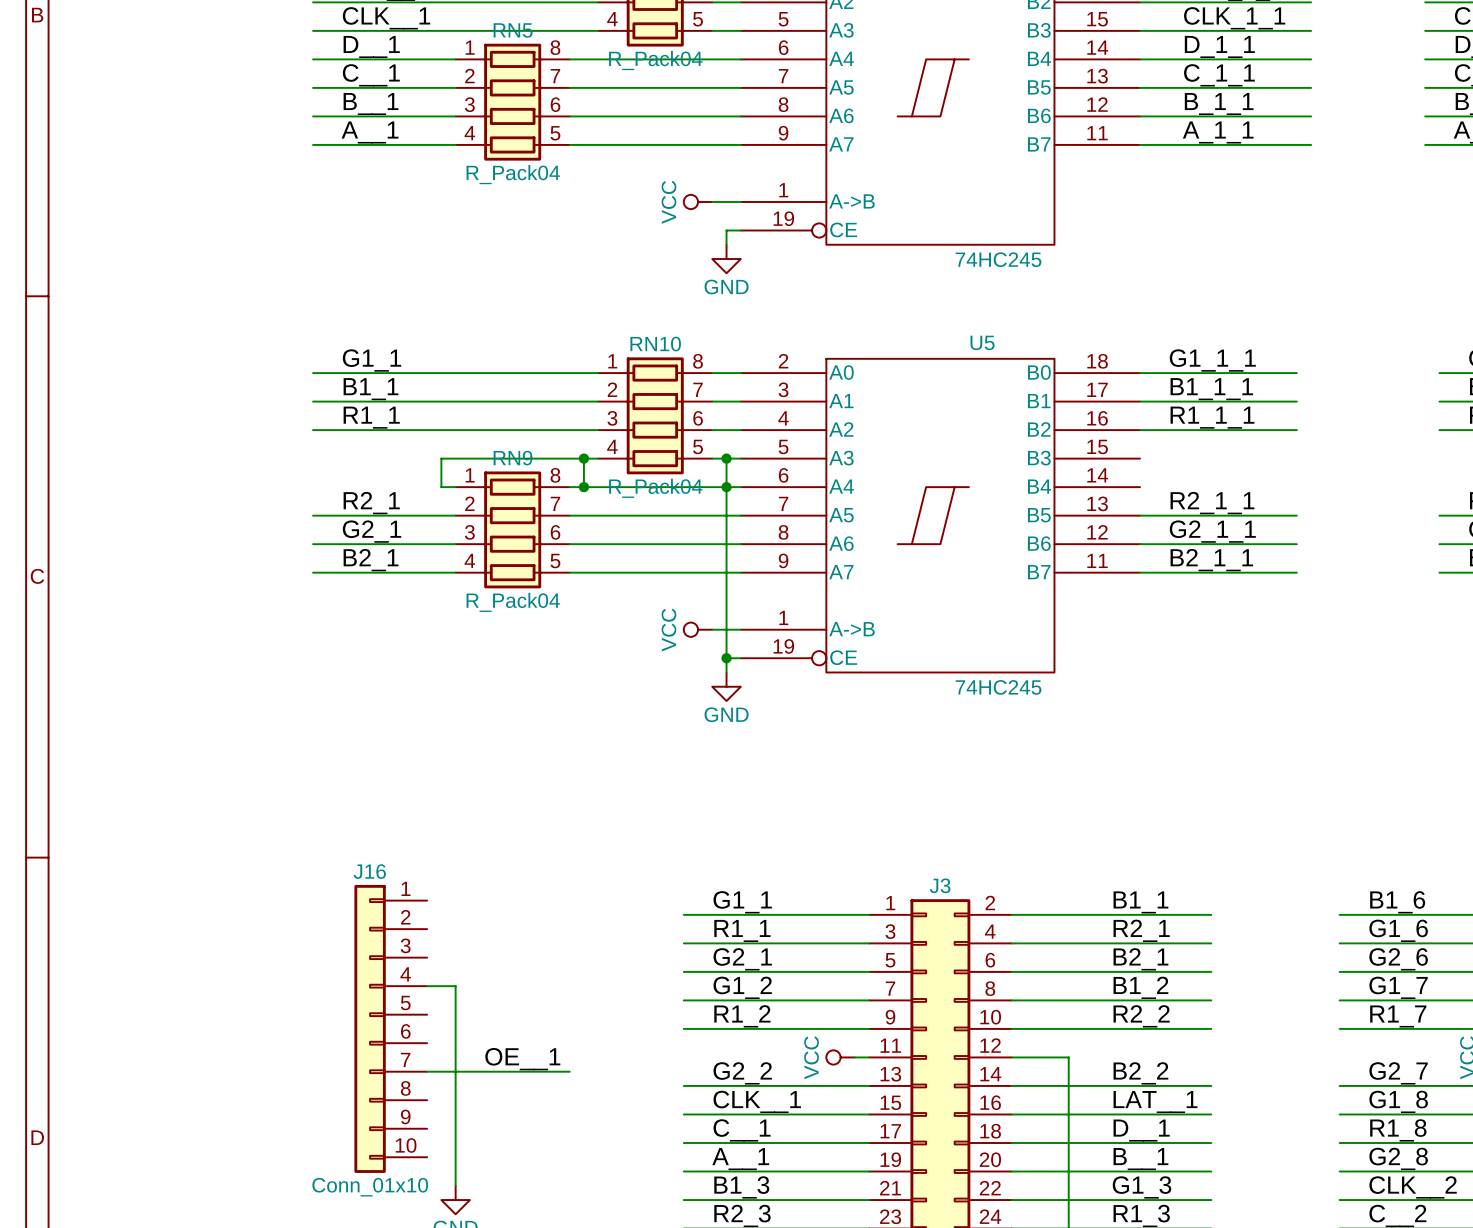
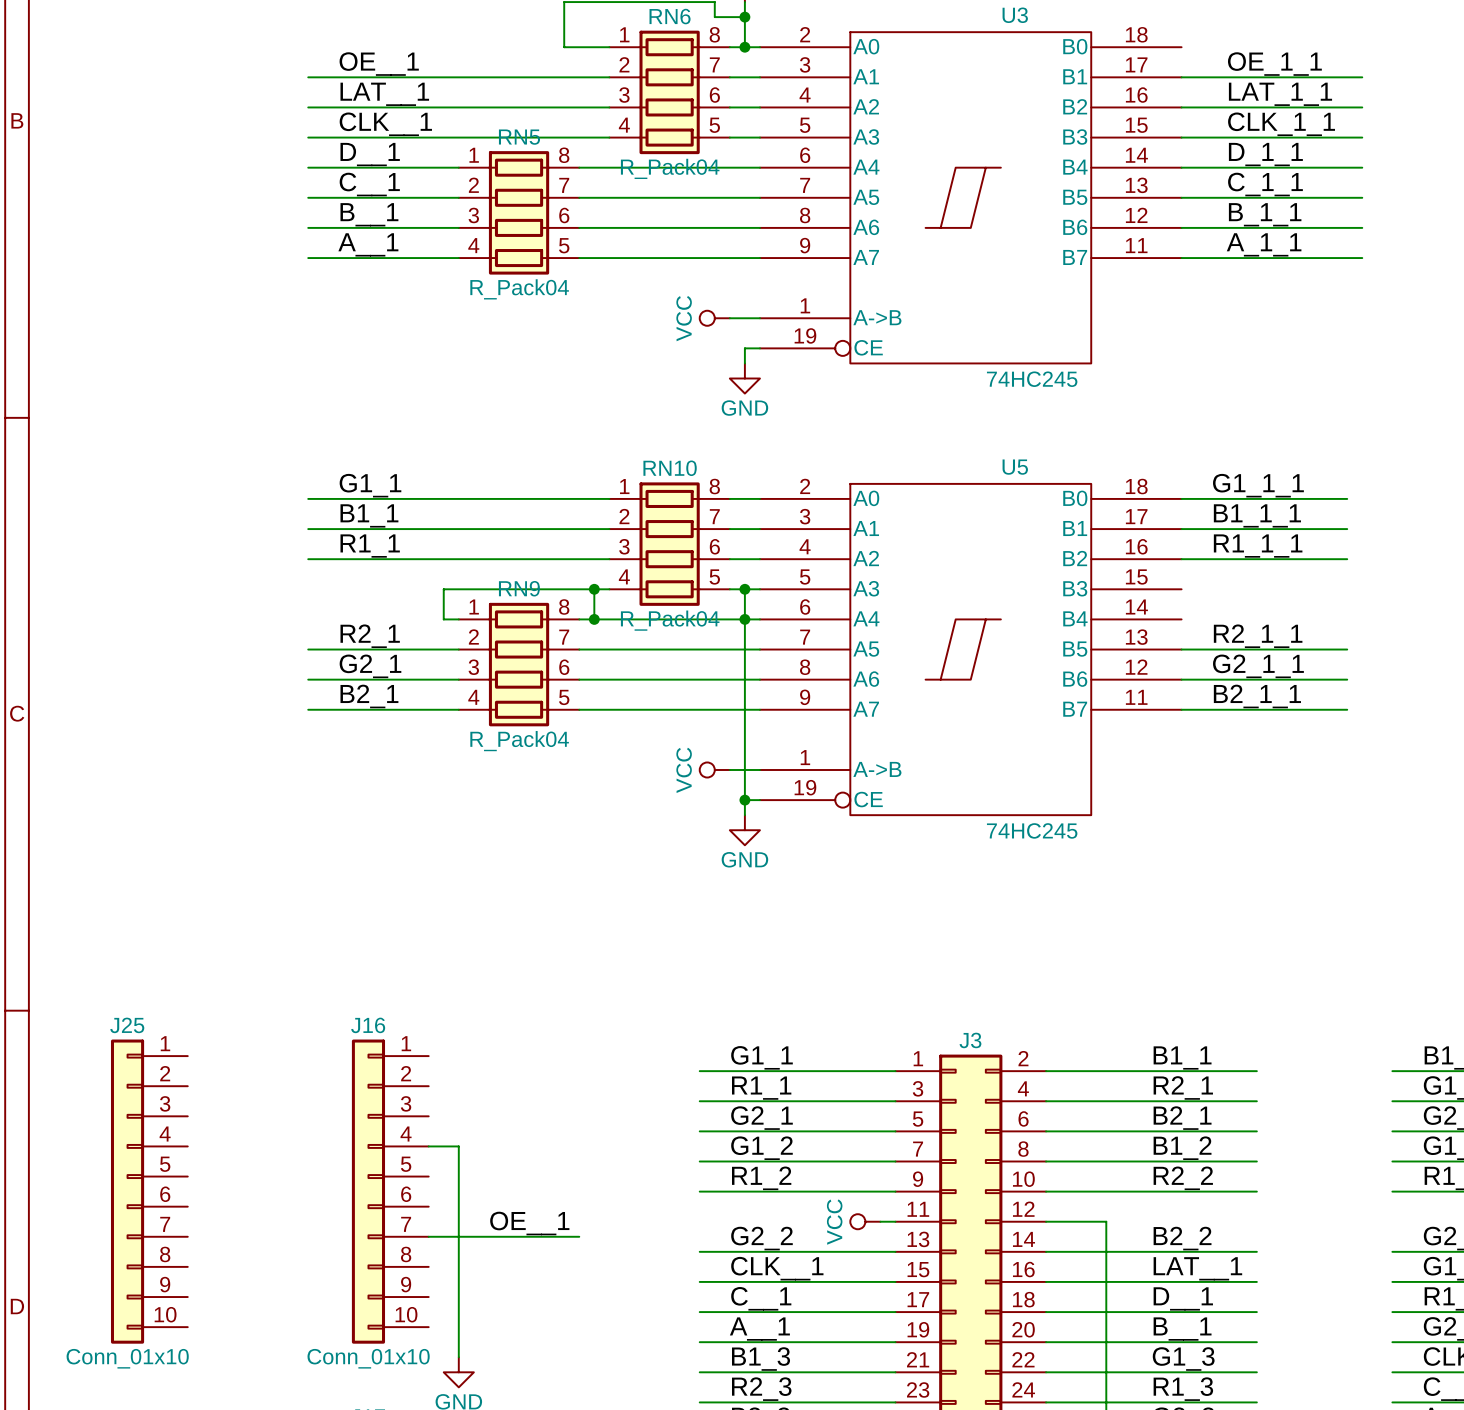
J25: none -> Conn_01x10 (149, 1191)

